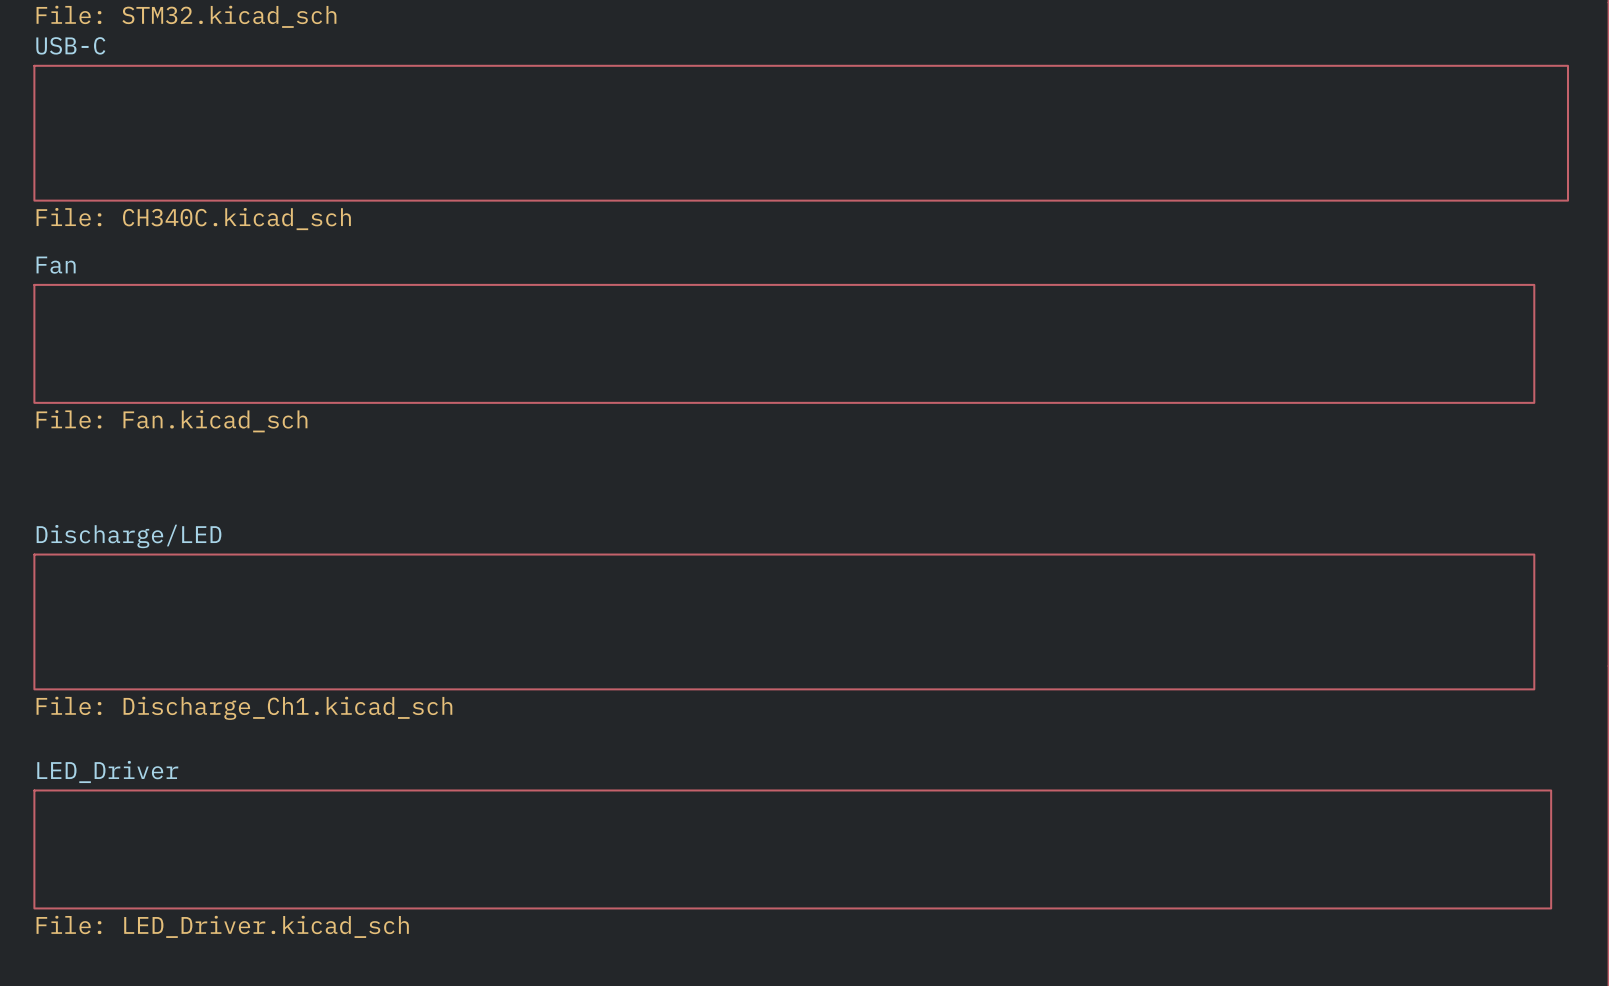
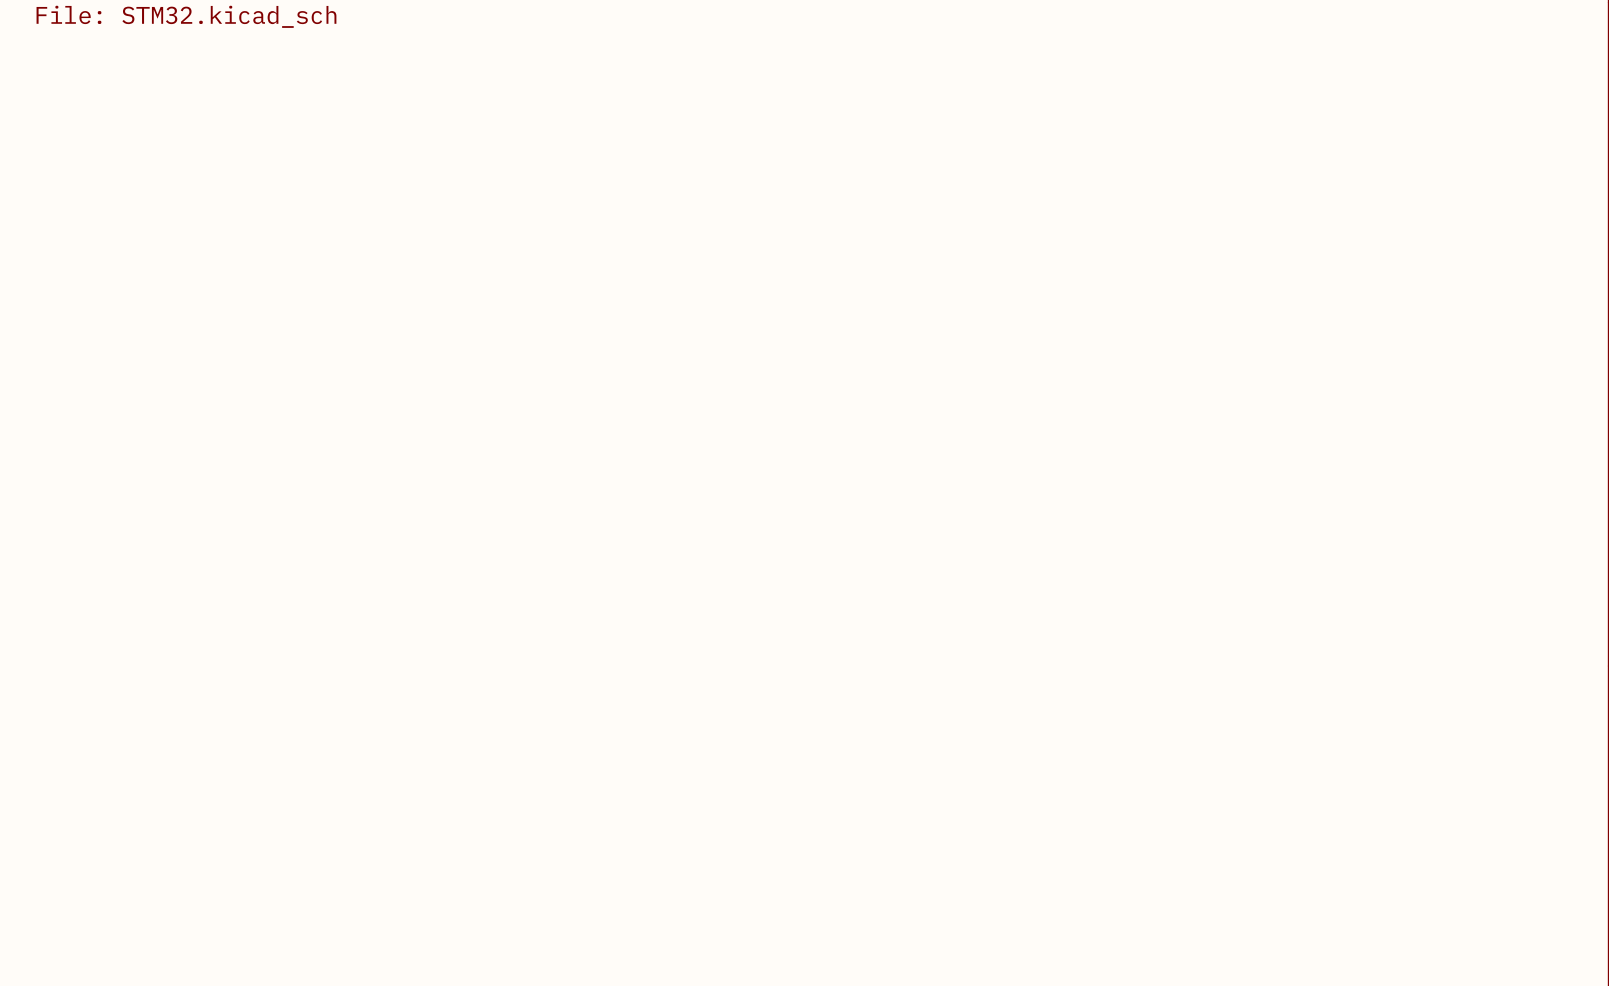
sheet USB-C: File: CH340C.kicad_sch (801, 133) -> none
sheet Fan: File: Fan.kicad_sch (784, 343) -> none
sheet Discharge/LED: File: Discharge_Ch1.kicad_sch (784, 621) -> none
sheet LED_Driver: File: LED_Driver.kicad_sch (792, 849) -> none

